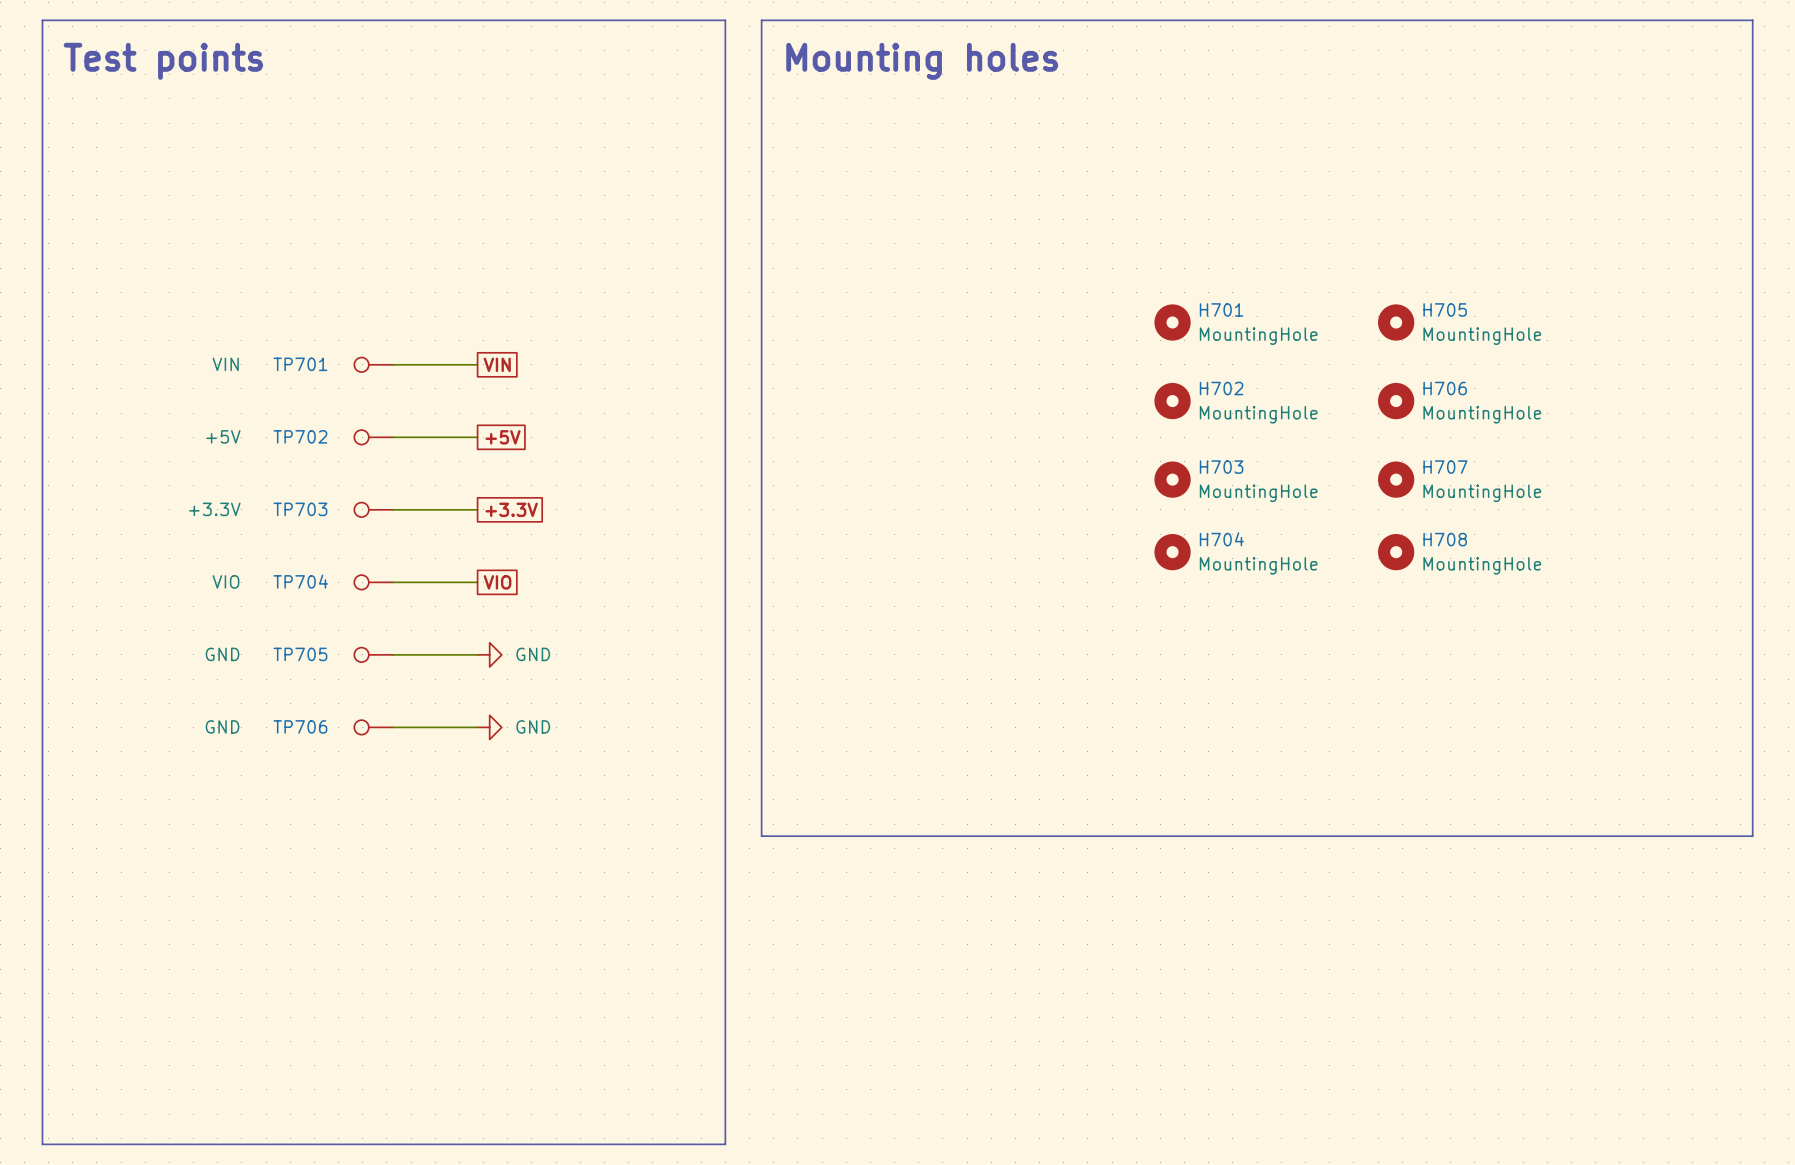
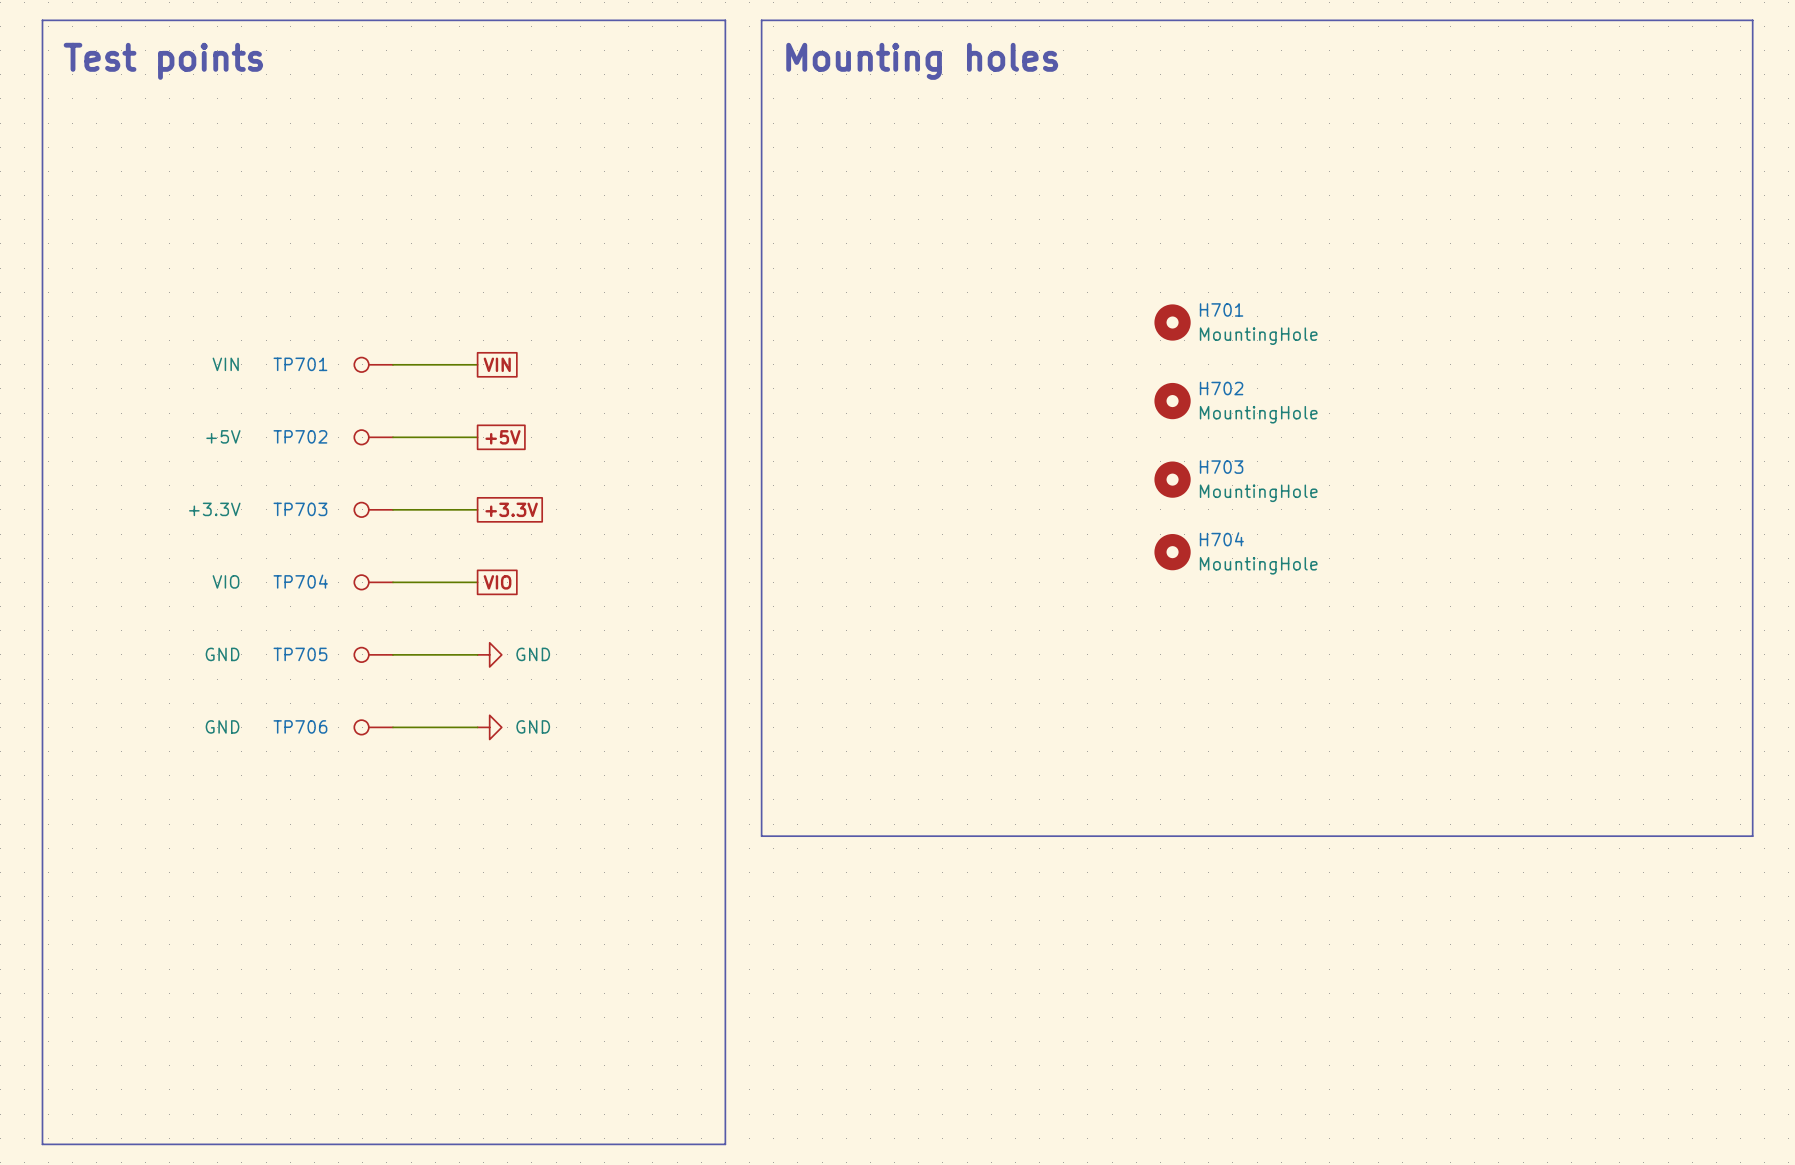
H705: MountingHole (1396, 322) -> none
H706: MountingHole (1396, 401) -> none
H707: MountingHole (1396, 479) -> none
H708: MountingHole (1396, 552) -> none

